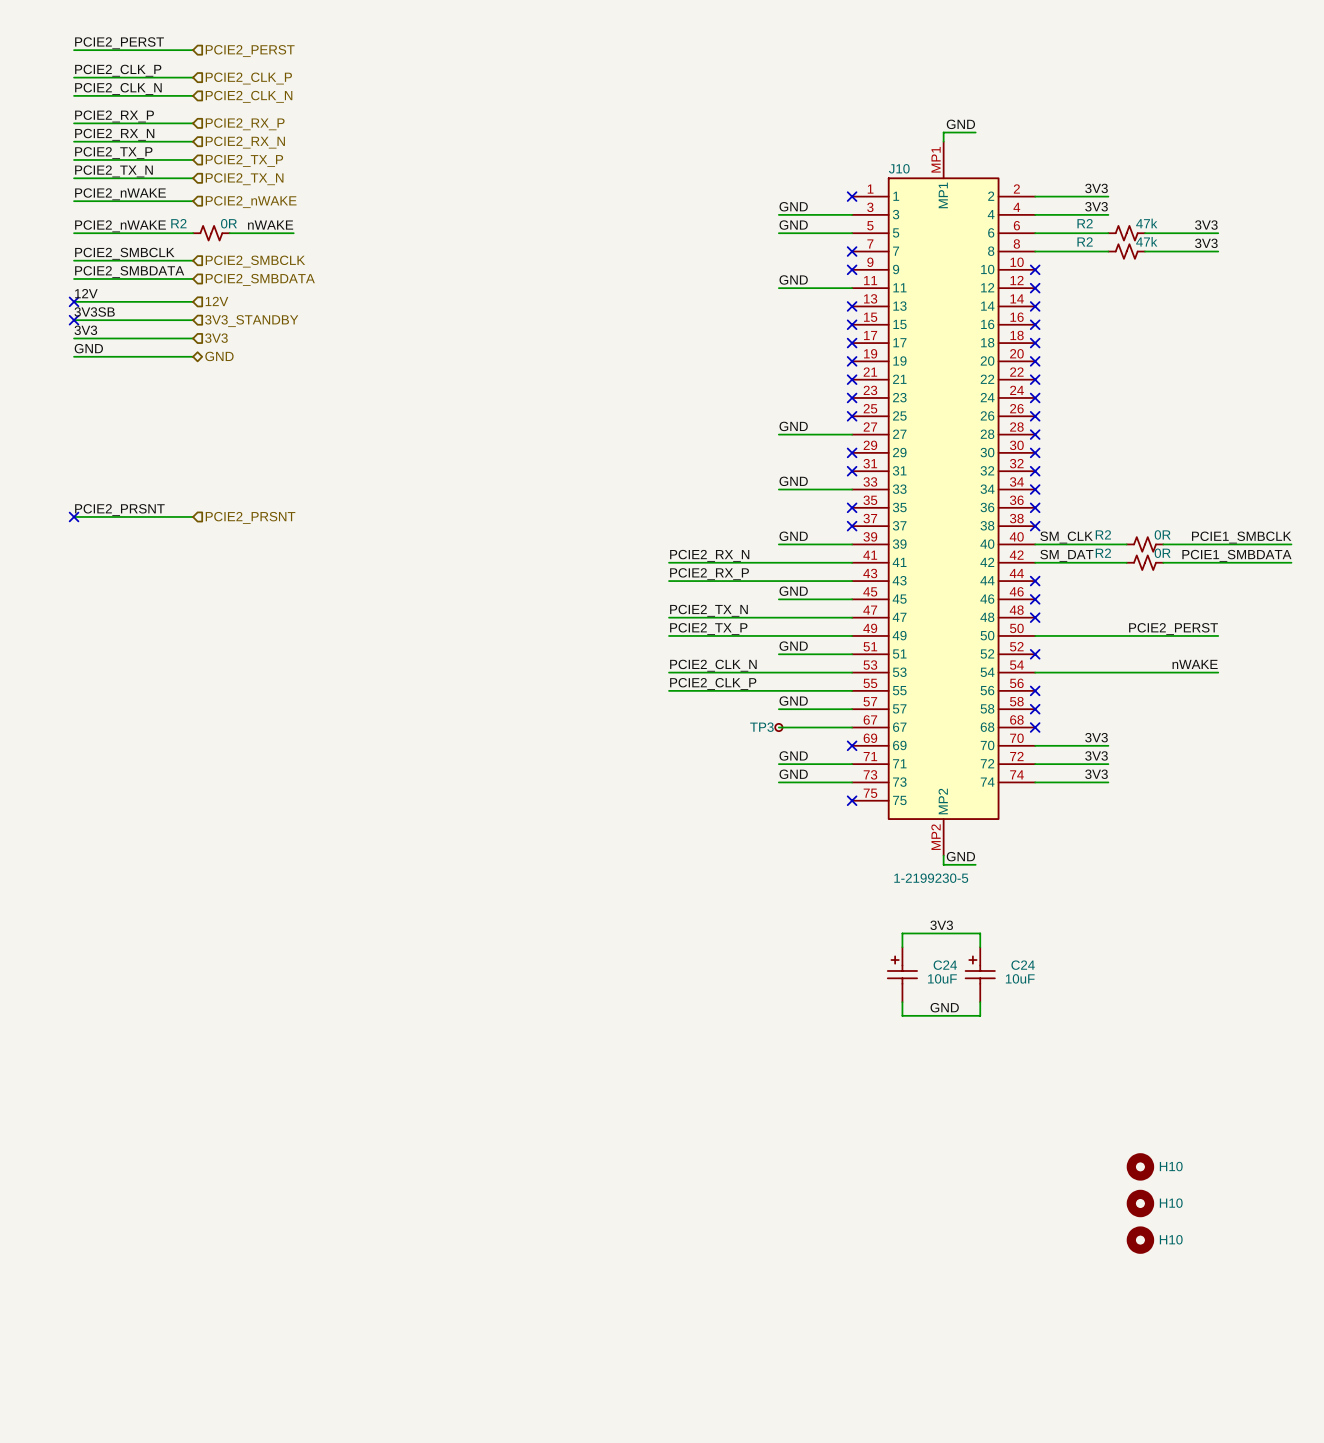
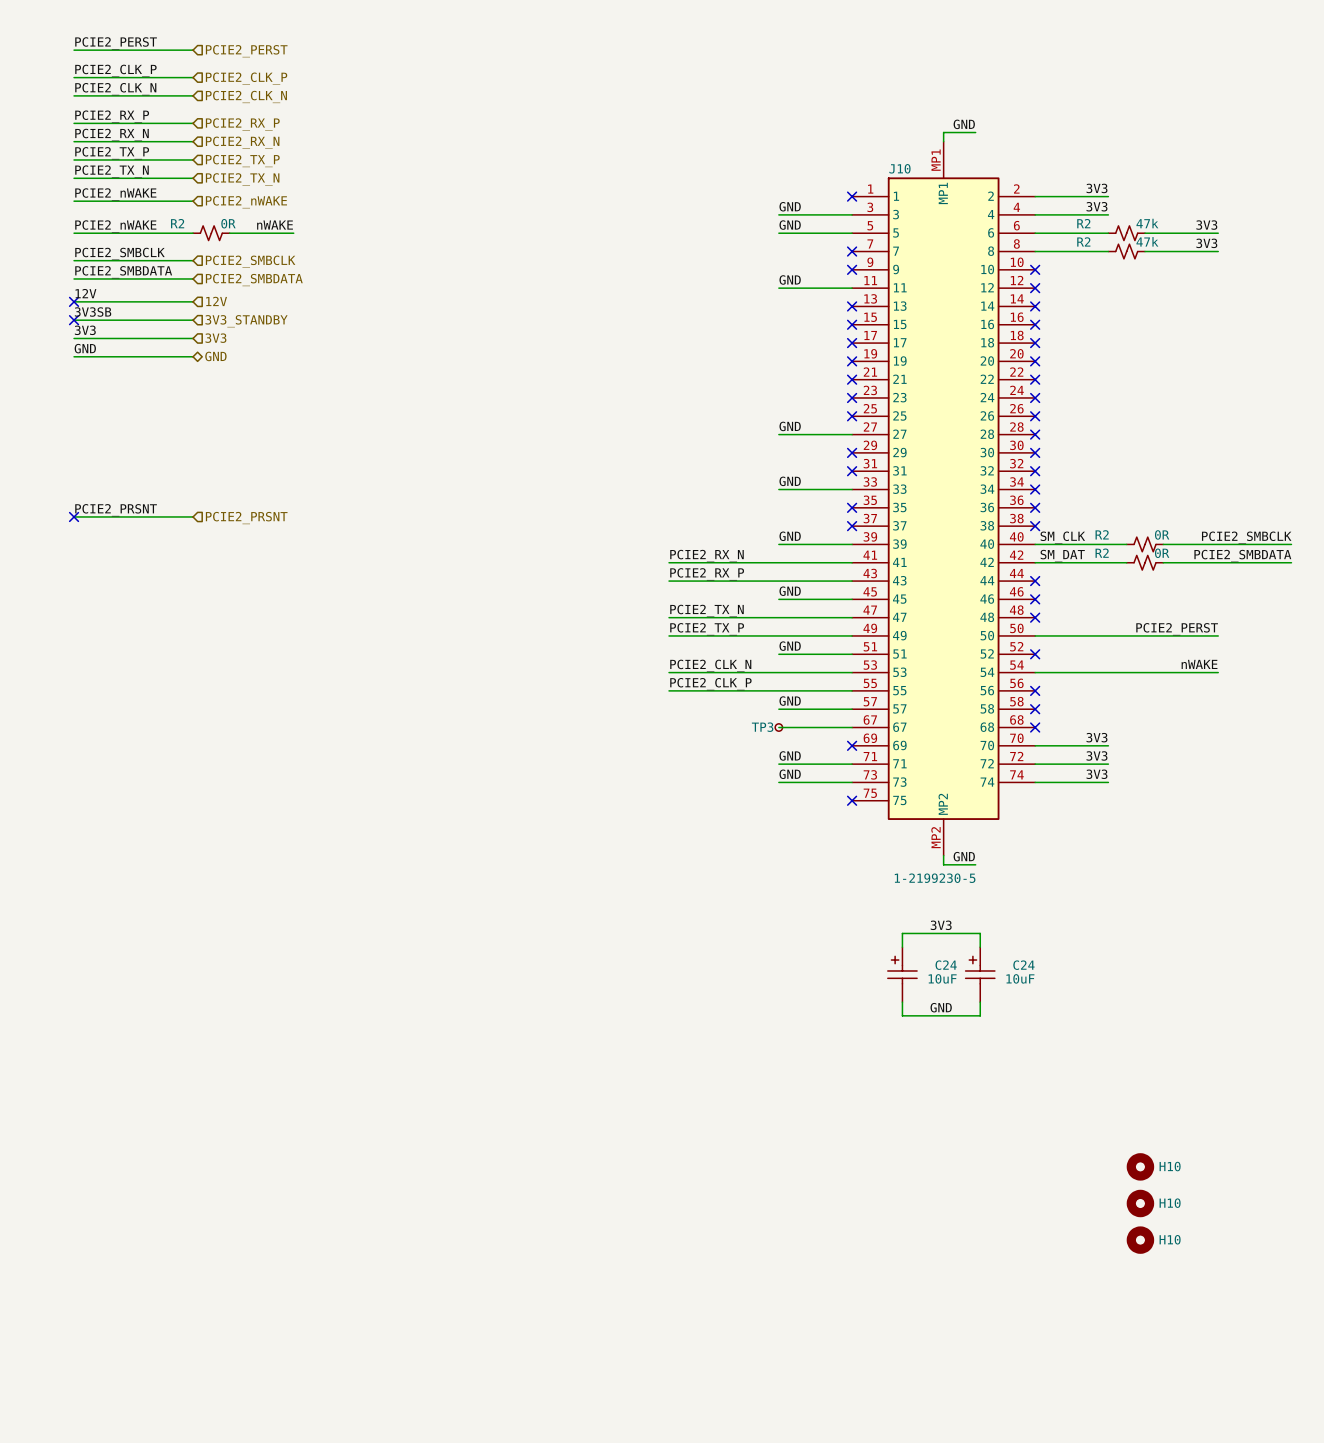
label: PCIE1_SMBCLK (1241, 537) -> PCIE2_SMBCLK (1246, 537)
label: PCIE1_SMBDATA (1236, 555) -> PCIE2_SMBDATA (1242, 555)

